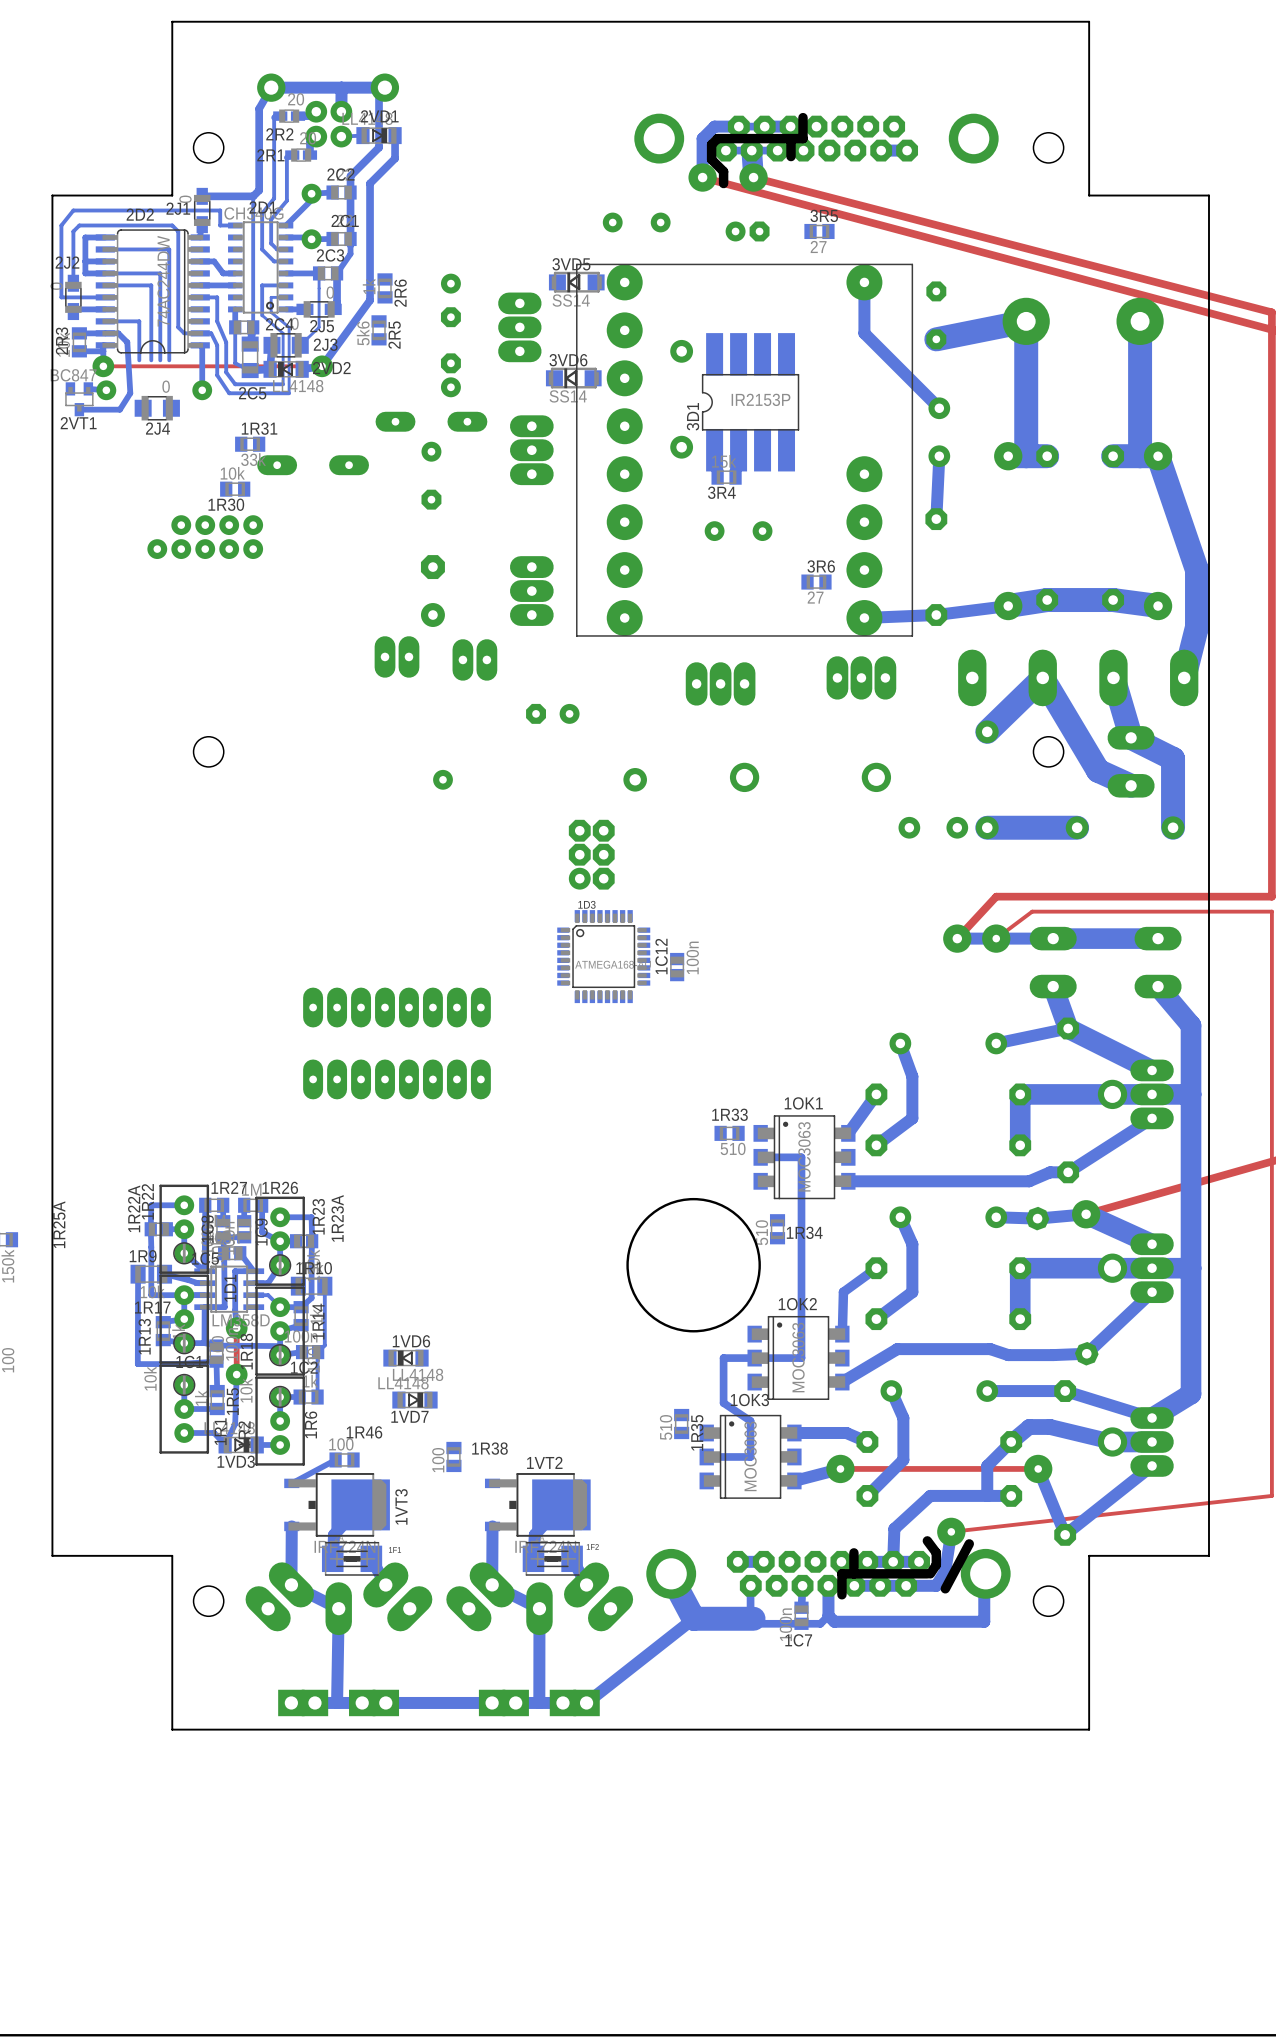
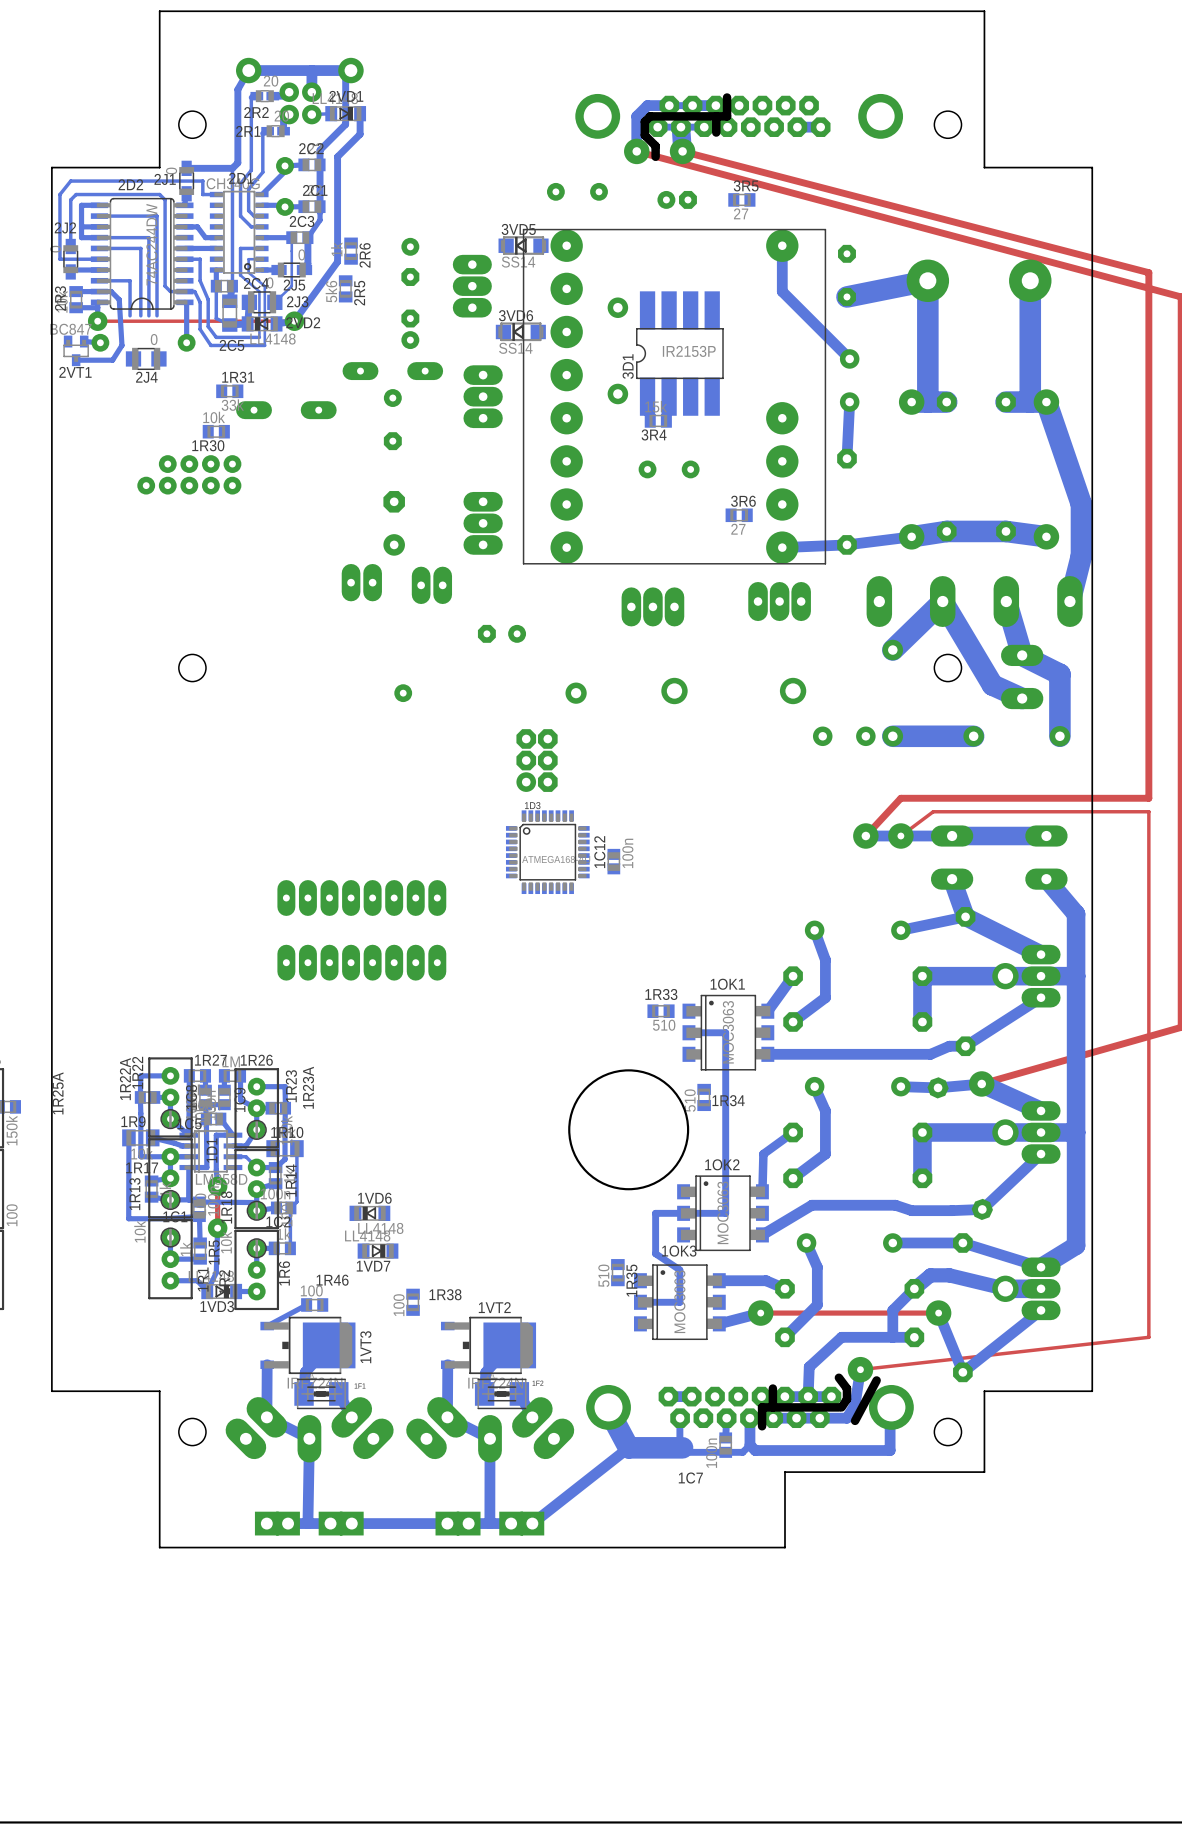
drawing shape: [51, 20, 1210, 1731] -> [51, 10, 1094, 1549]
1C7 name position: 1C7 (798, 1640) -> 1C7 (690, 1478)

